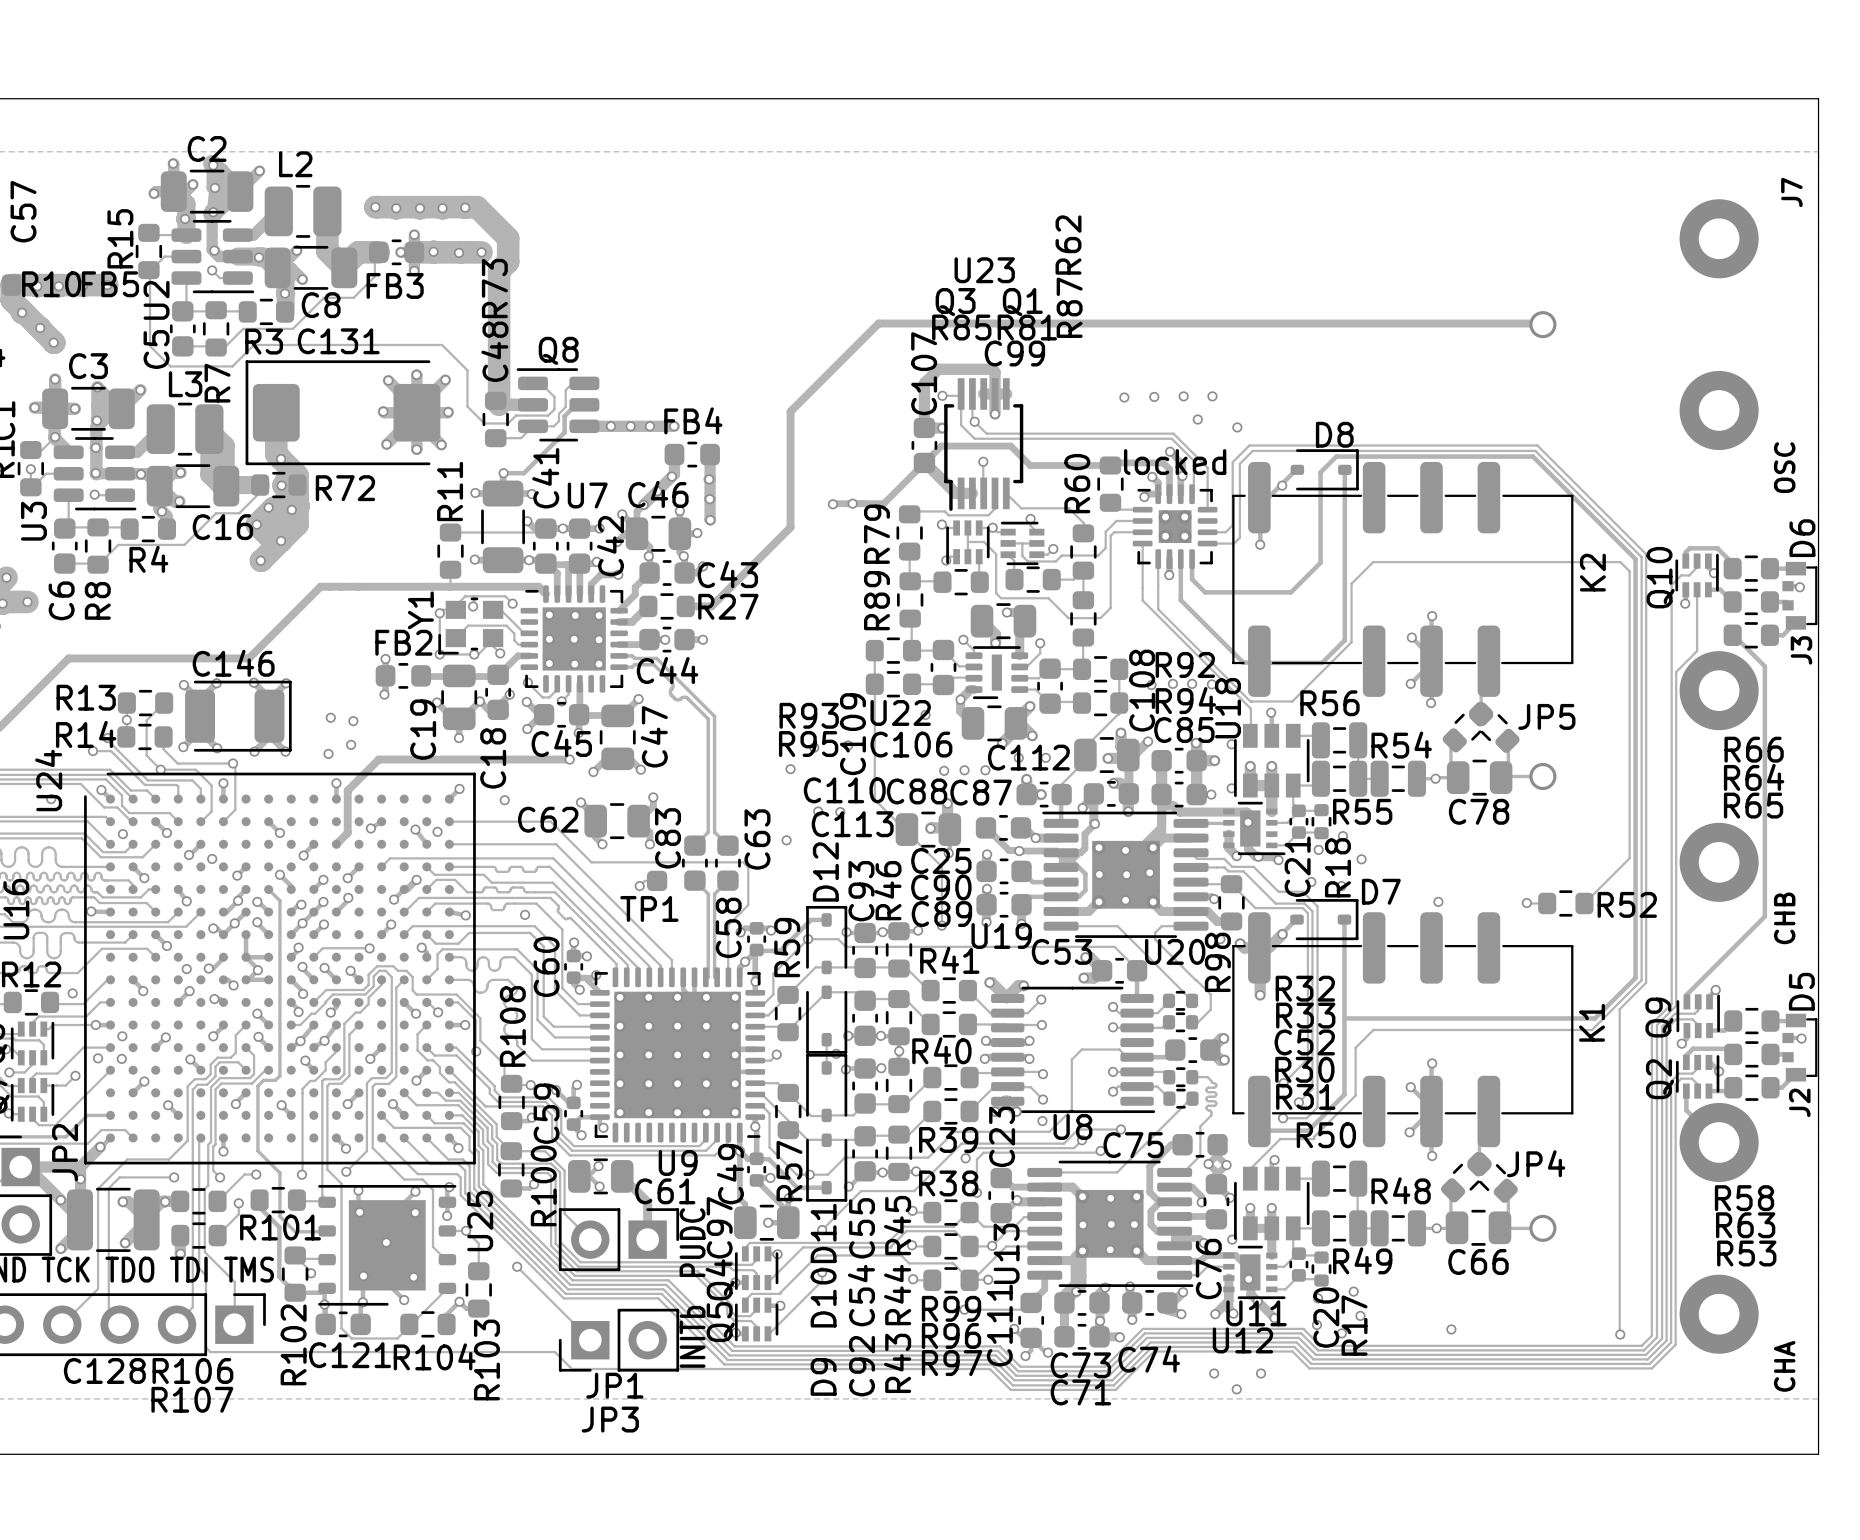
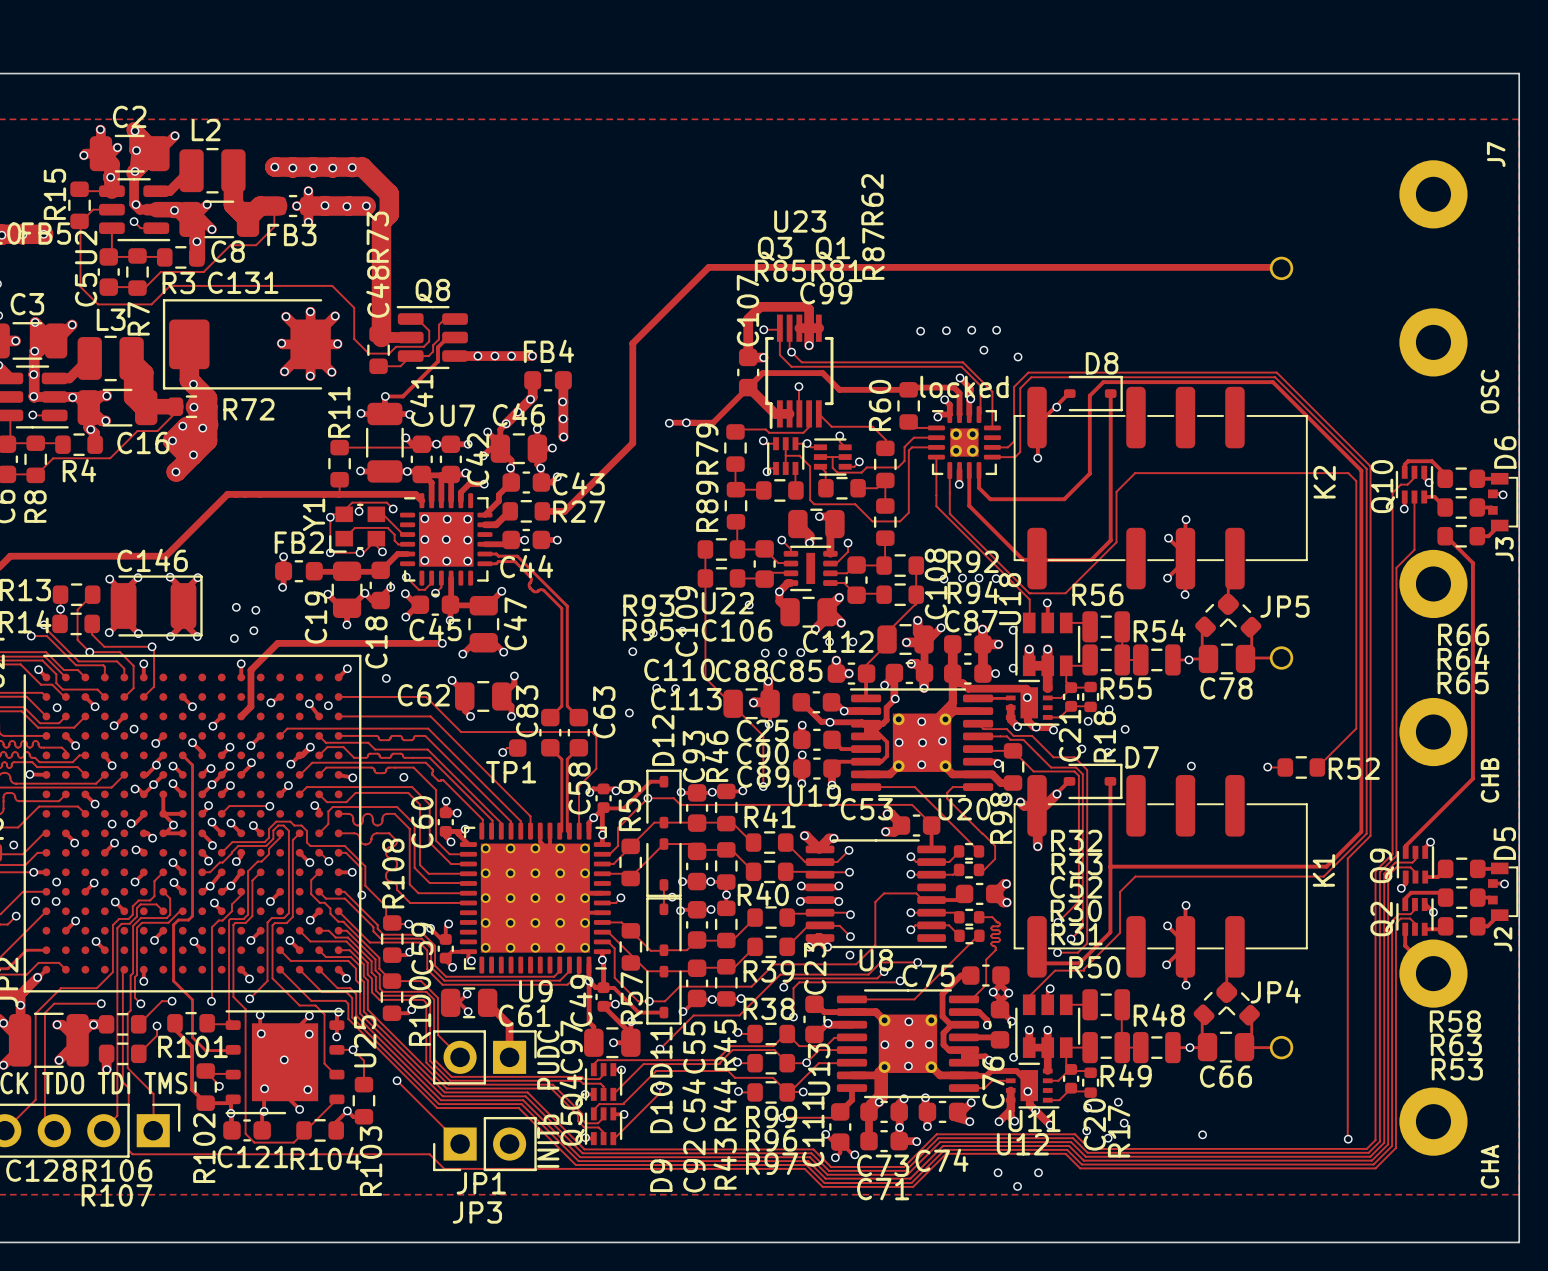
C85 name position: C85 (1184, 730) -> C85 (796, 670)
C87 name position: C87 (981, 792) -> C87 (971, 621)

